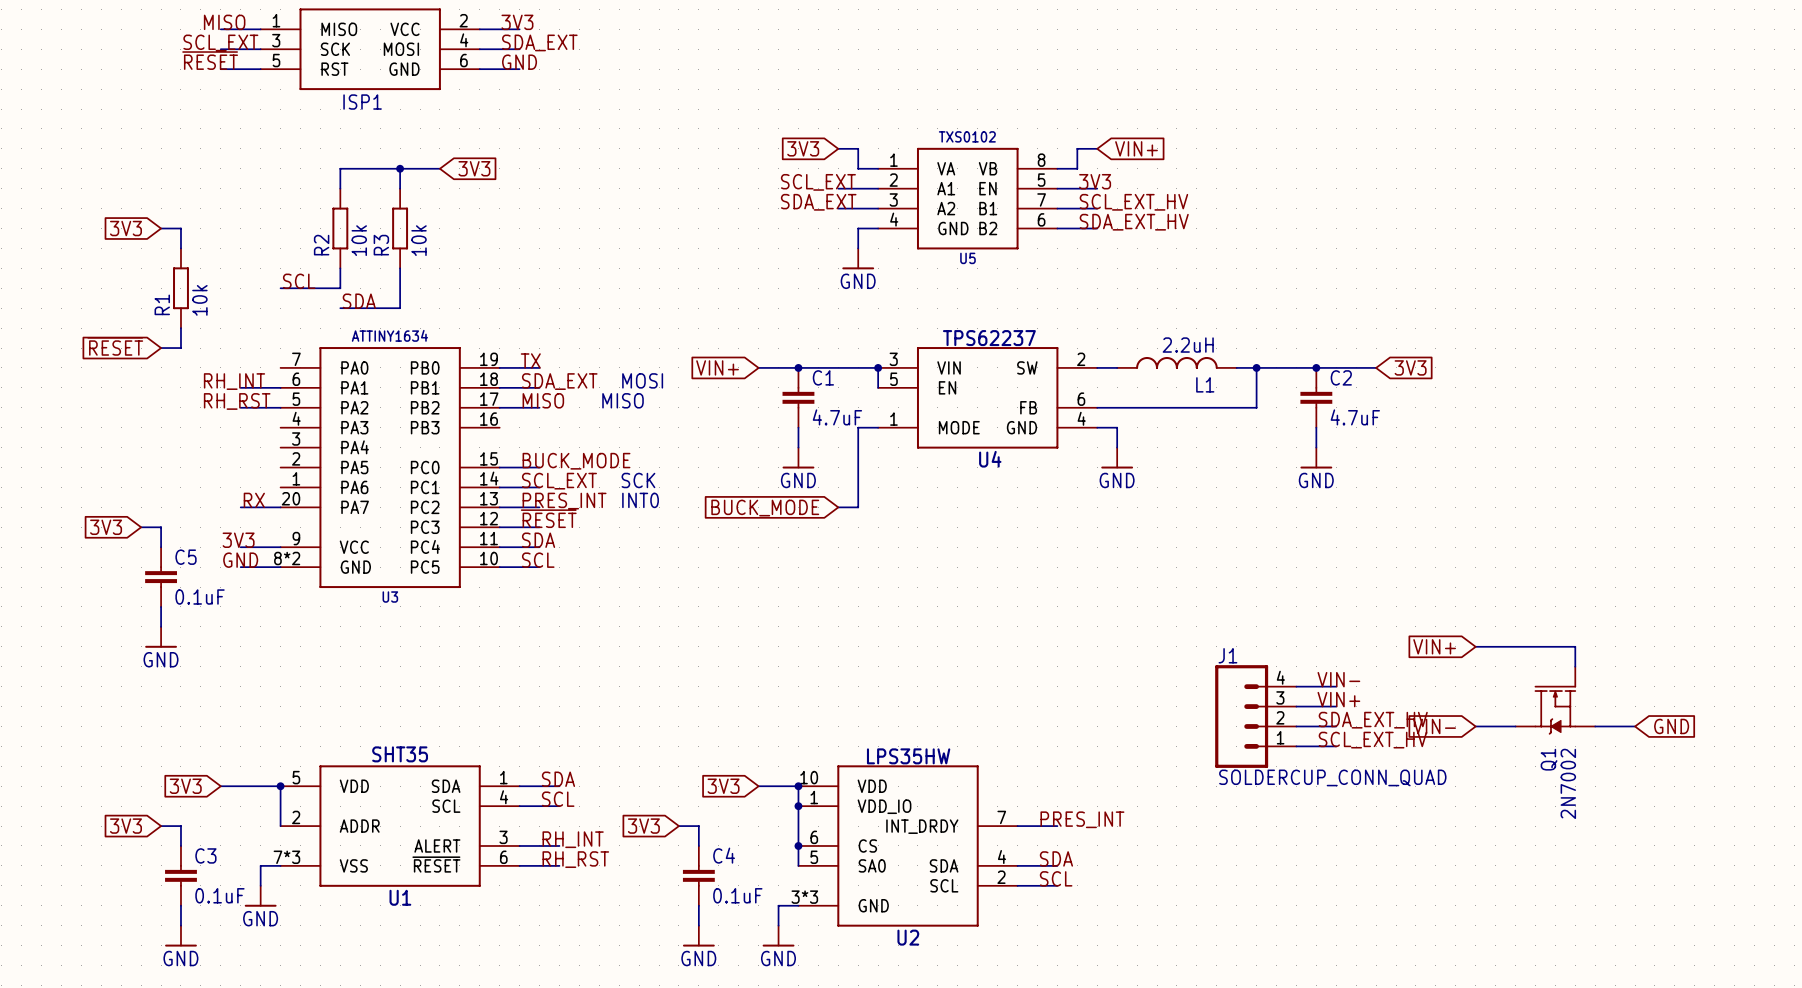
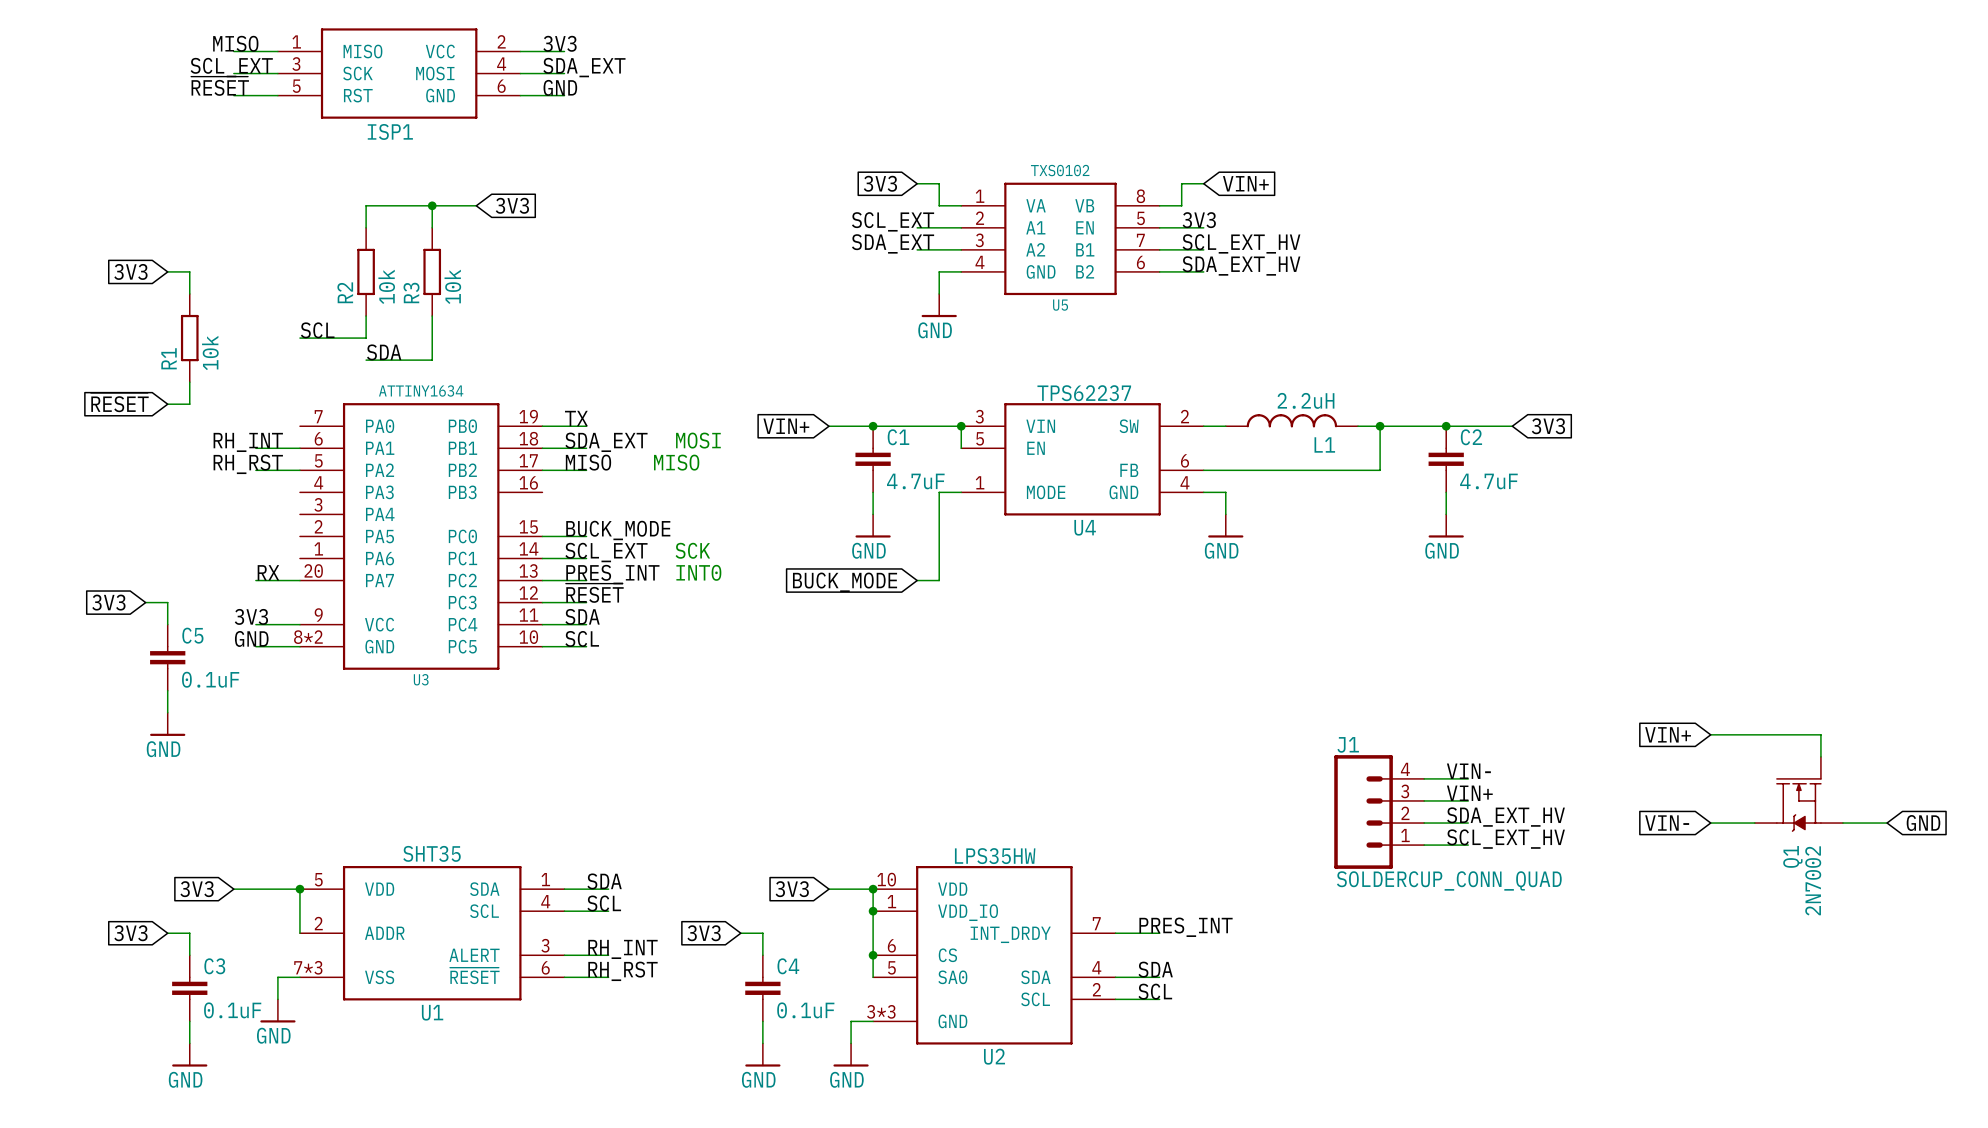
global label position: VIN+ (1434, 646) -> VIN+ (1668, 734)
wire: (1475, 646) (1555, 646) -> none
wire: (1575, 646) (1575, 666) -> (1732, 734) (1820, 734) (1820, 756)
Q1 position: (1555, 700) -> (1798, 794)
global label position: VIN- (1434, 726) -> VIN- (1667, 823)
wire: (1475, 726) (1515, 726) -> none
global label position: GND (1671, 726) -> GND (1923, 823)
wire: none -> (1842, 823) (1887, 823)

